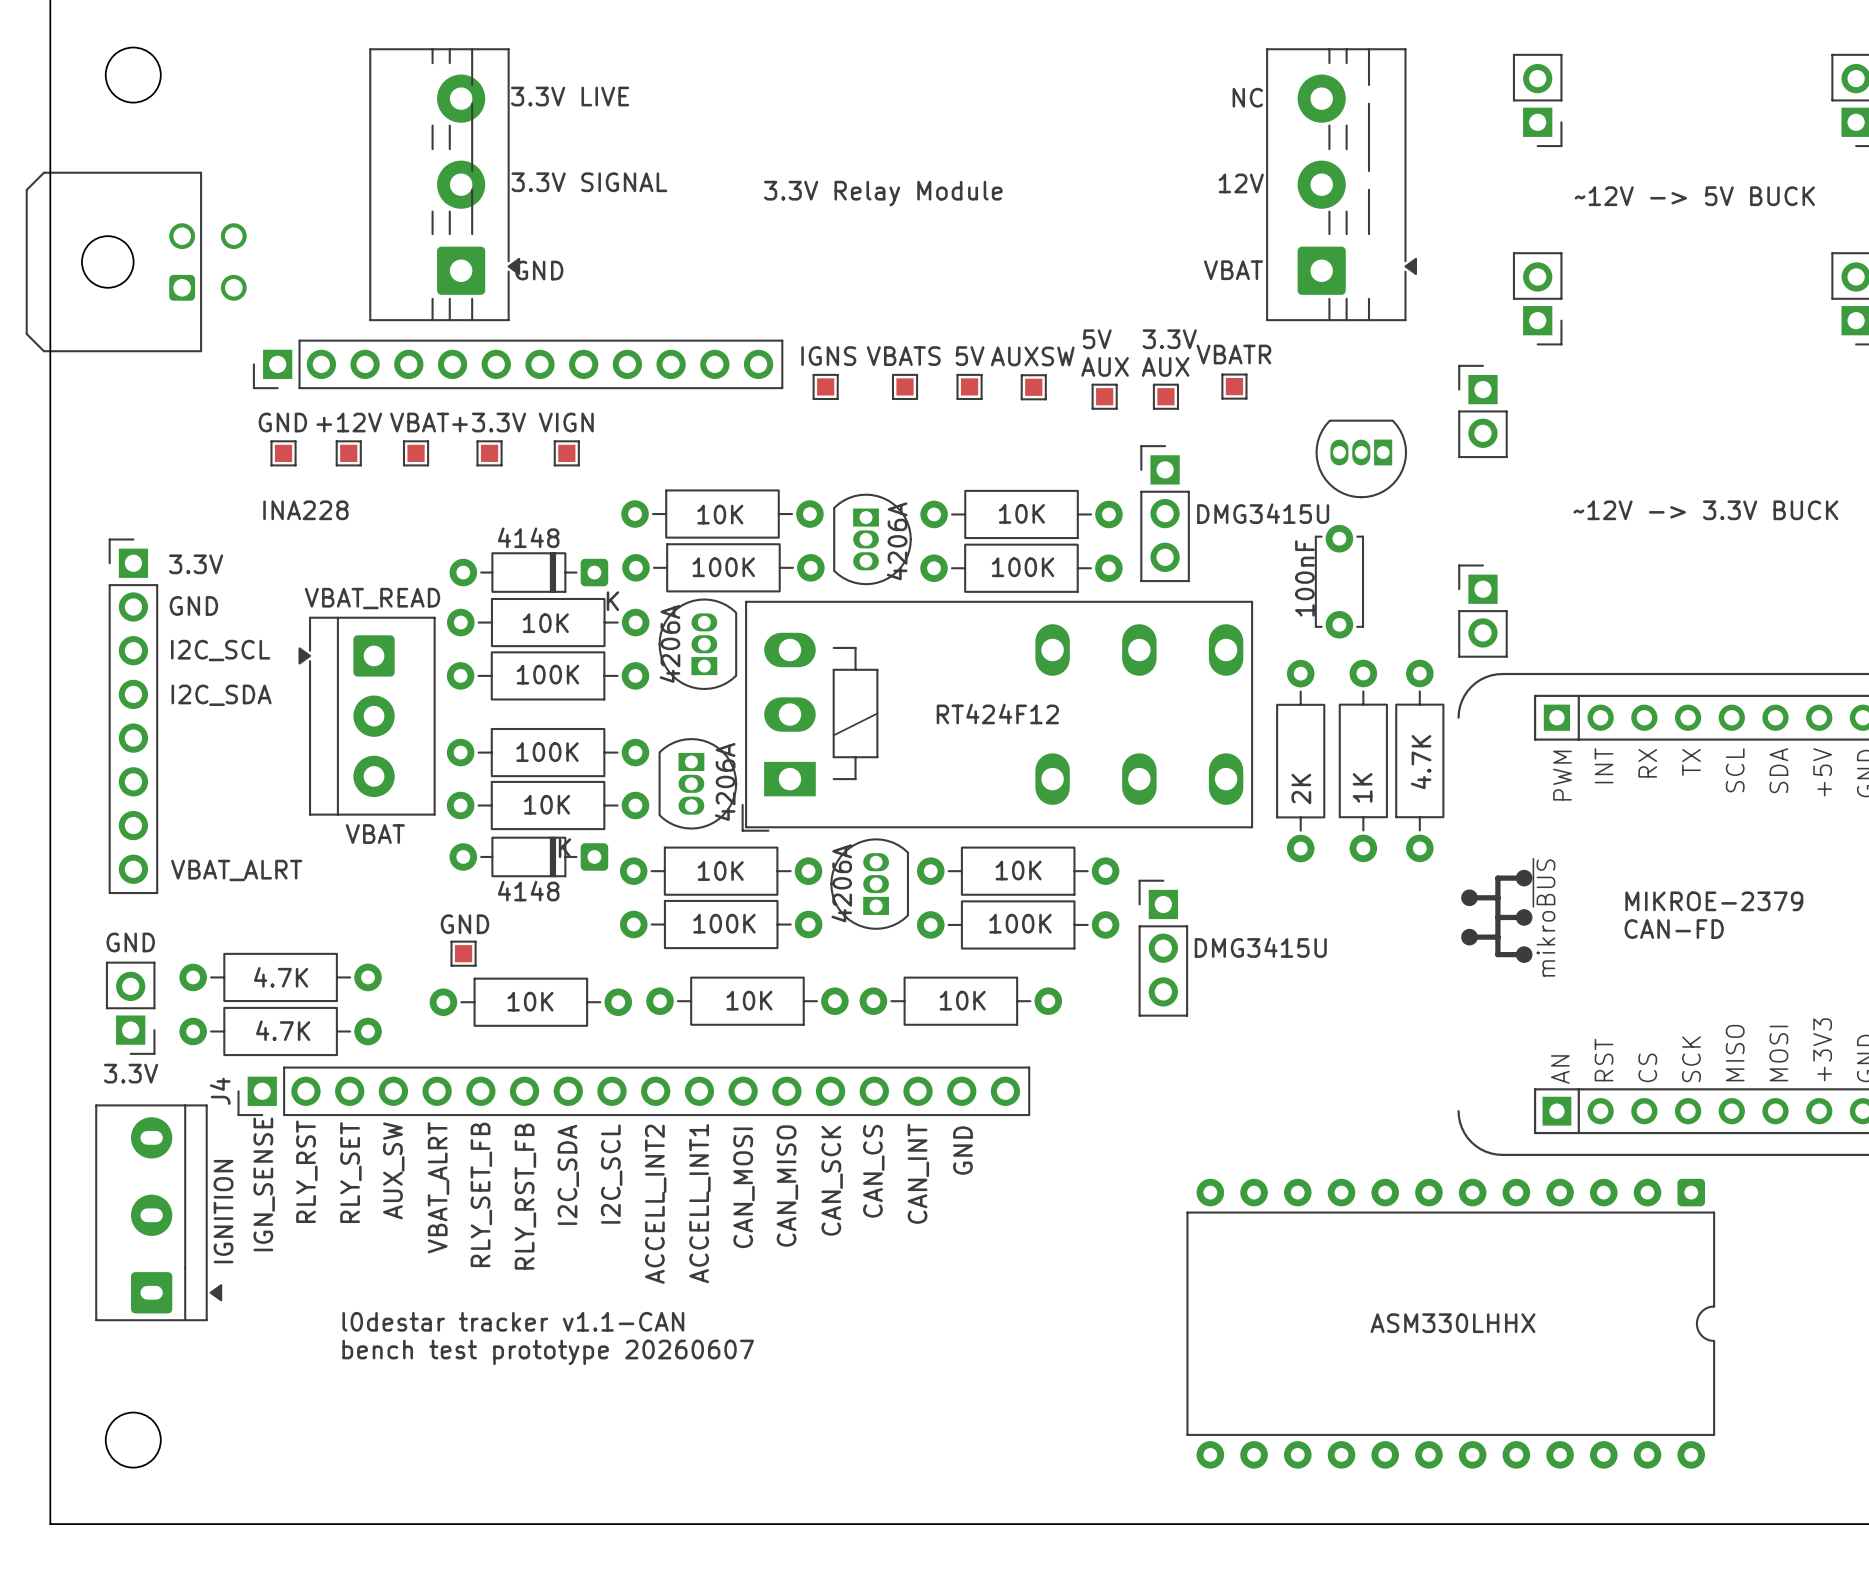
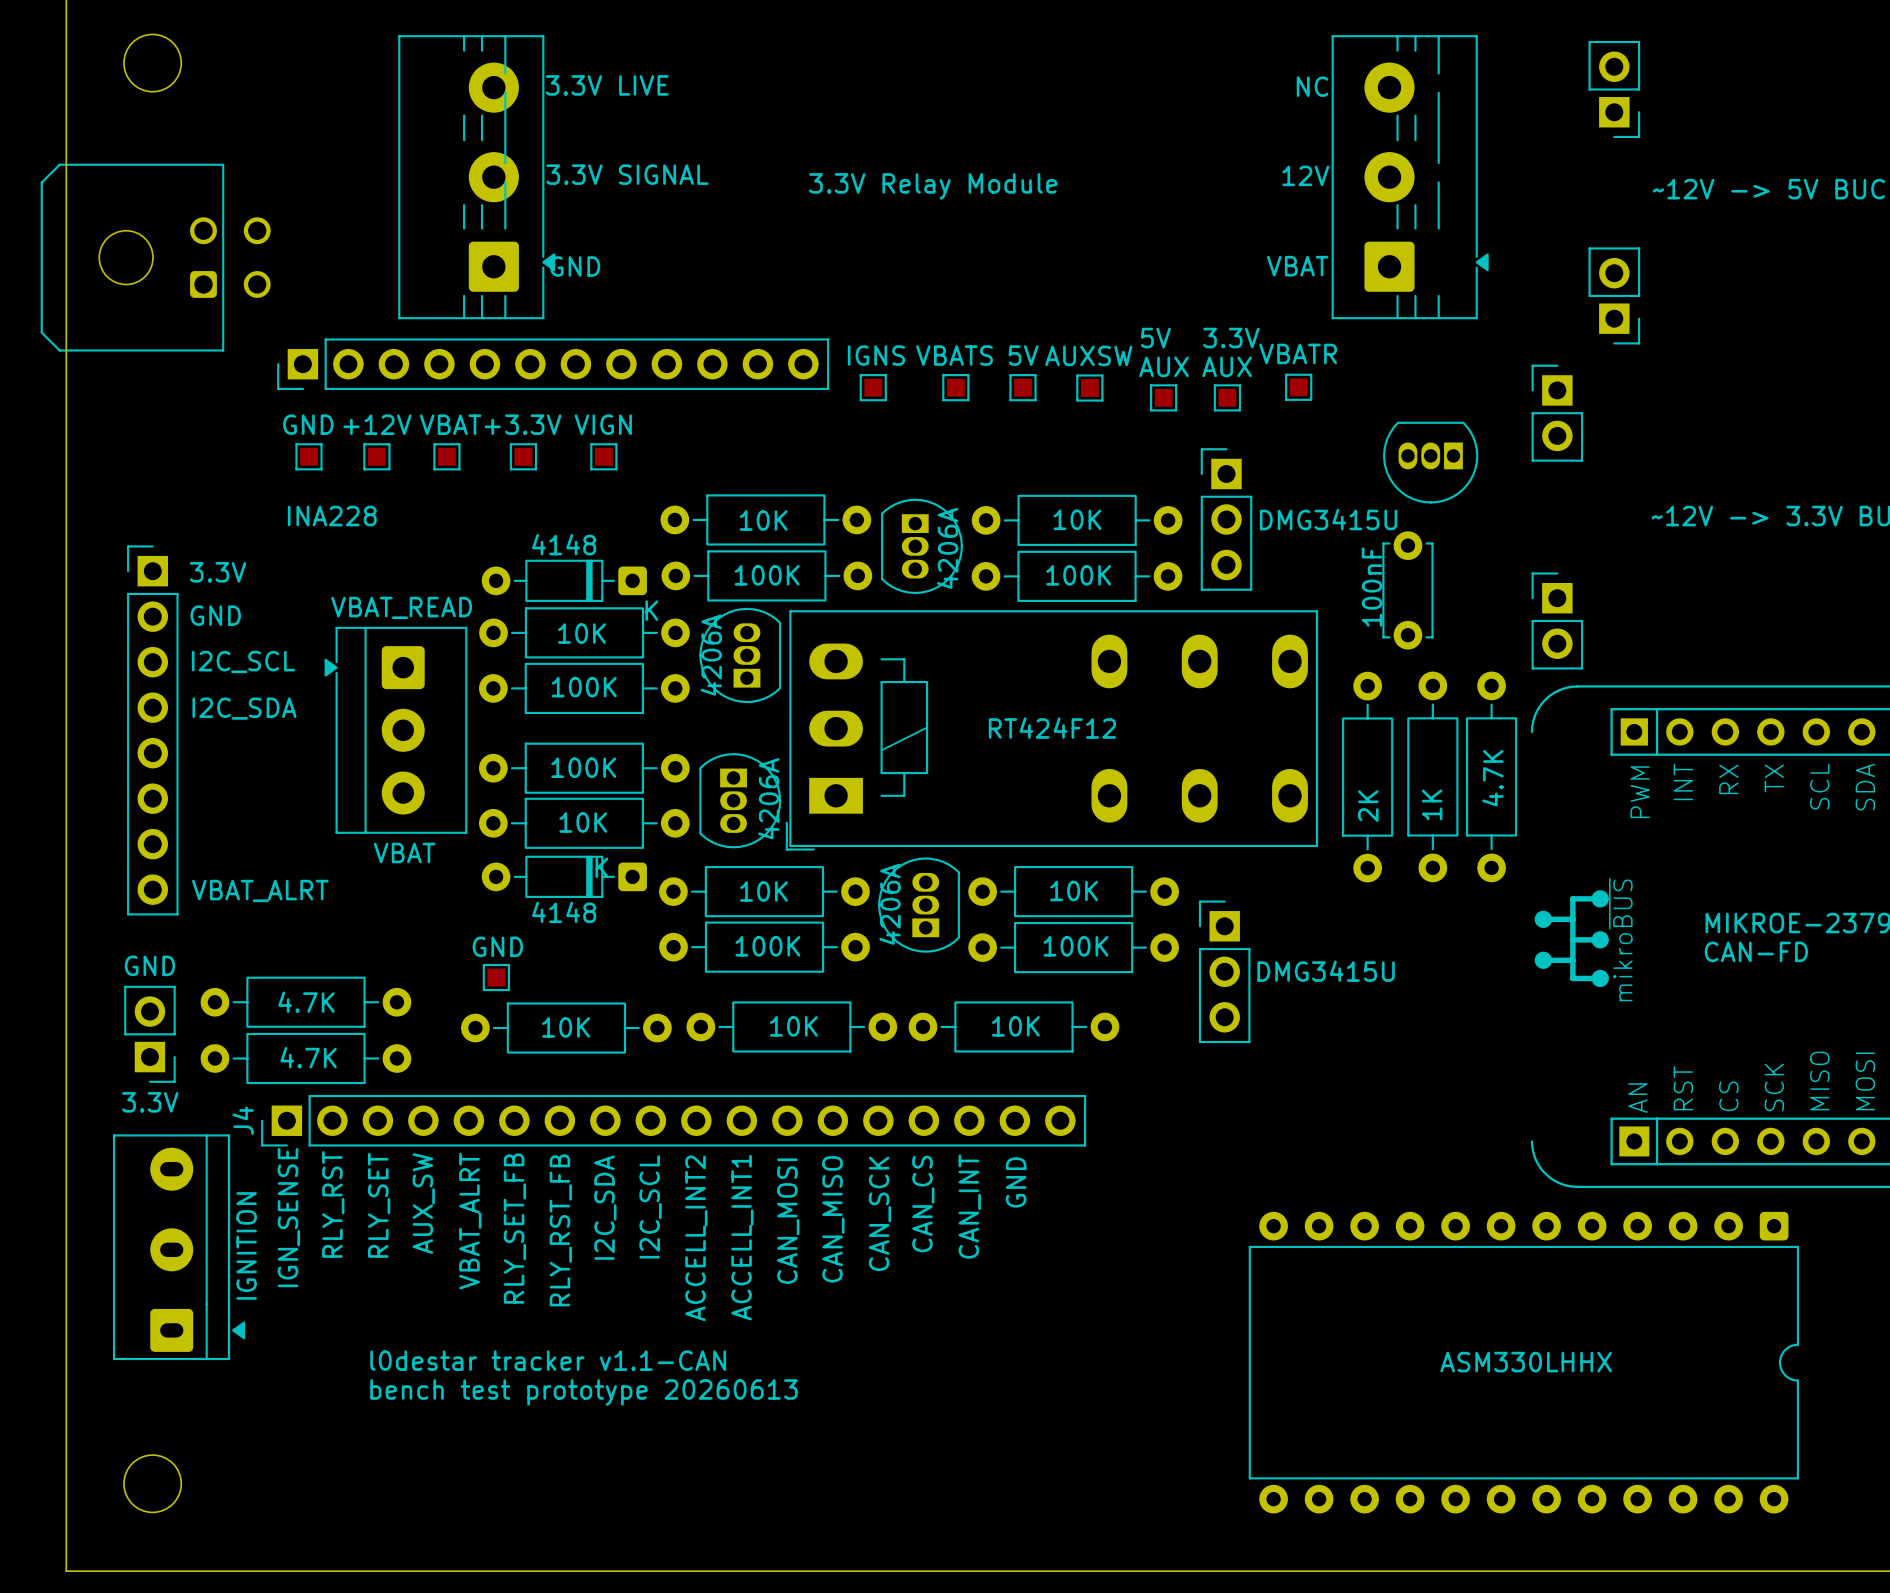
text: bench test prototype 20260607 (548, 1352) -> bench test prototype 20260613 (584, 1392)

